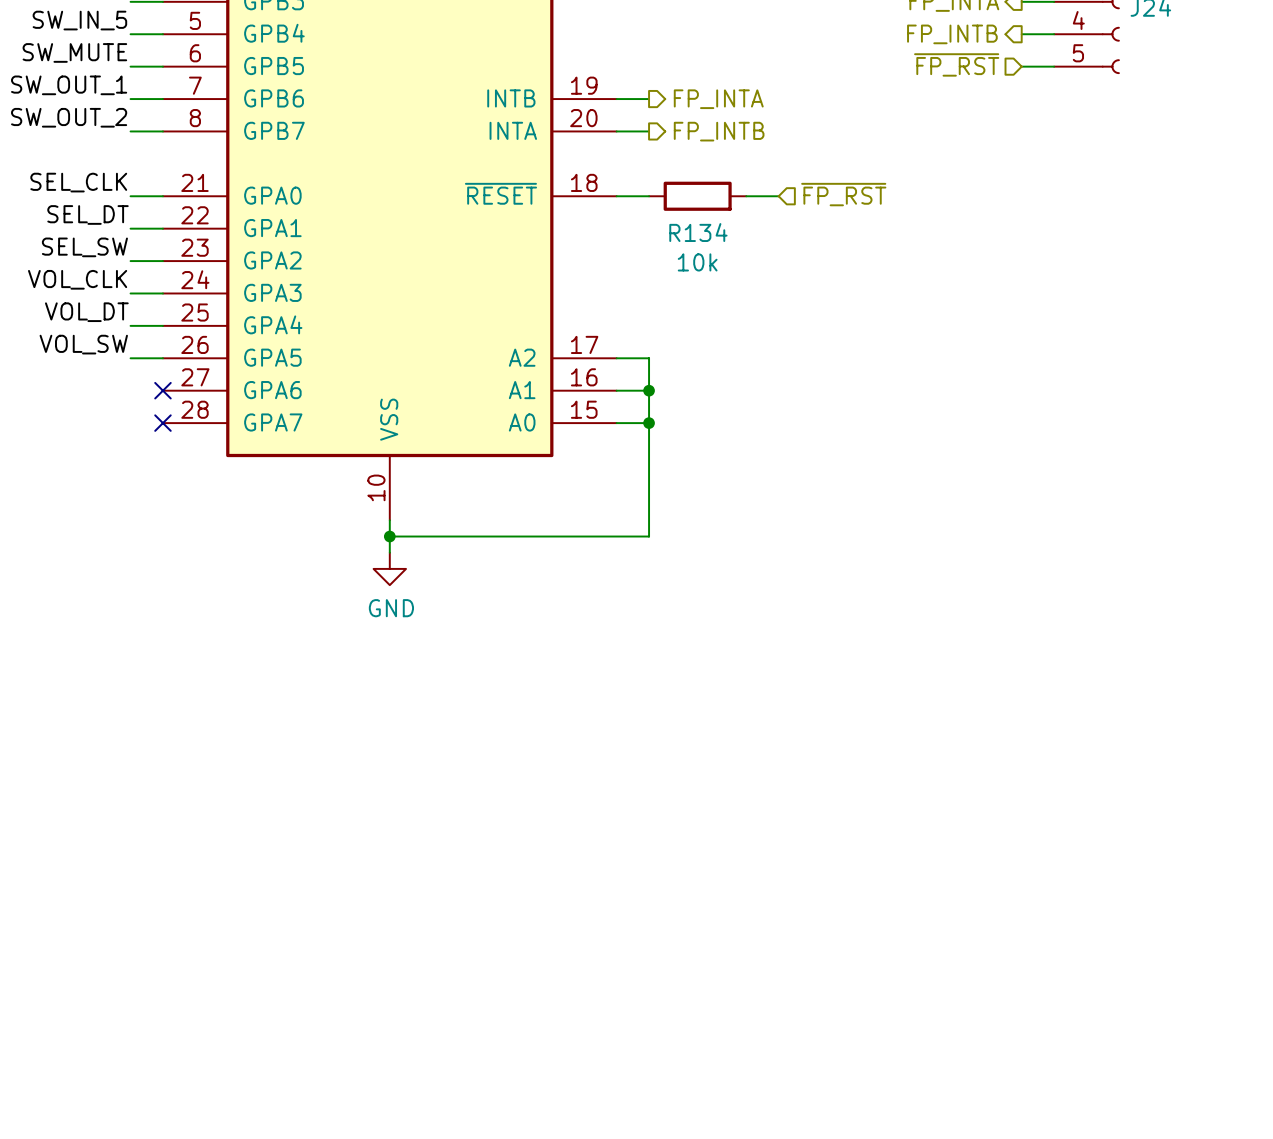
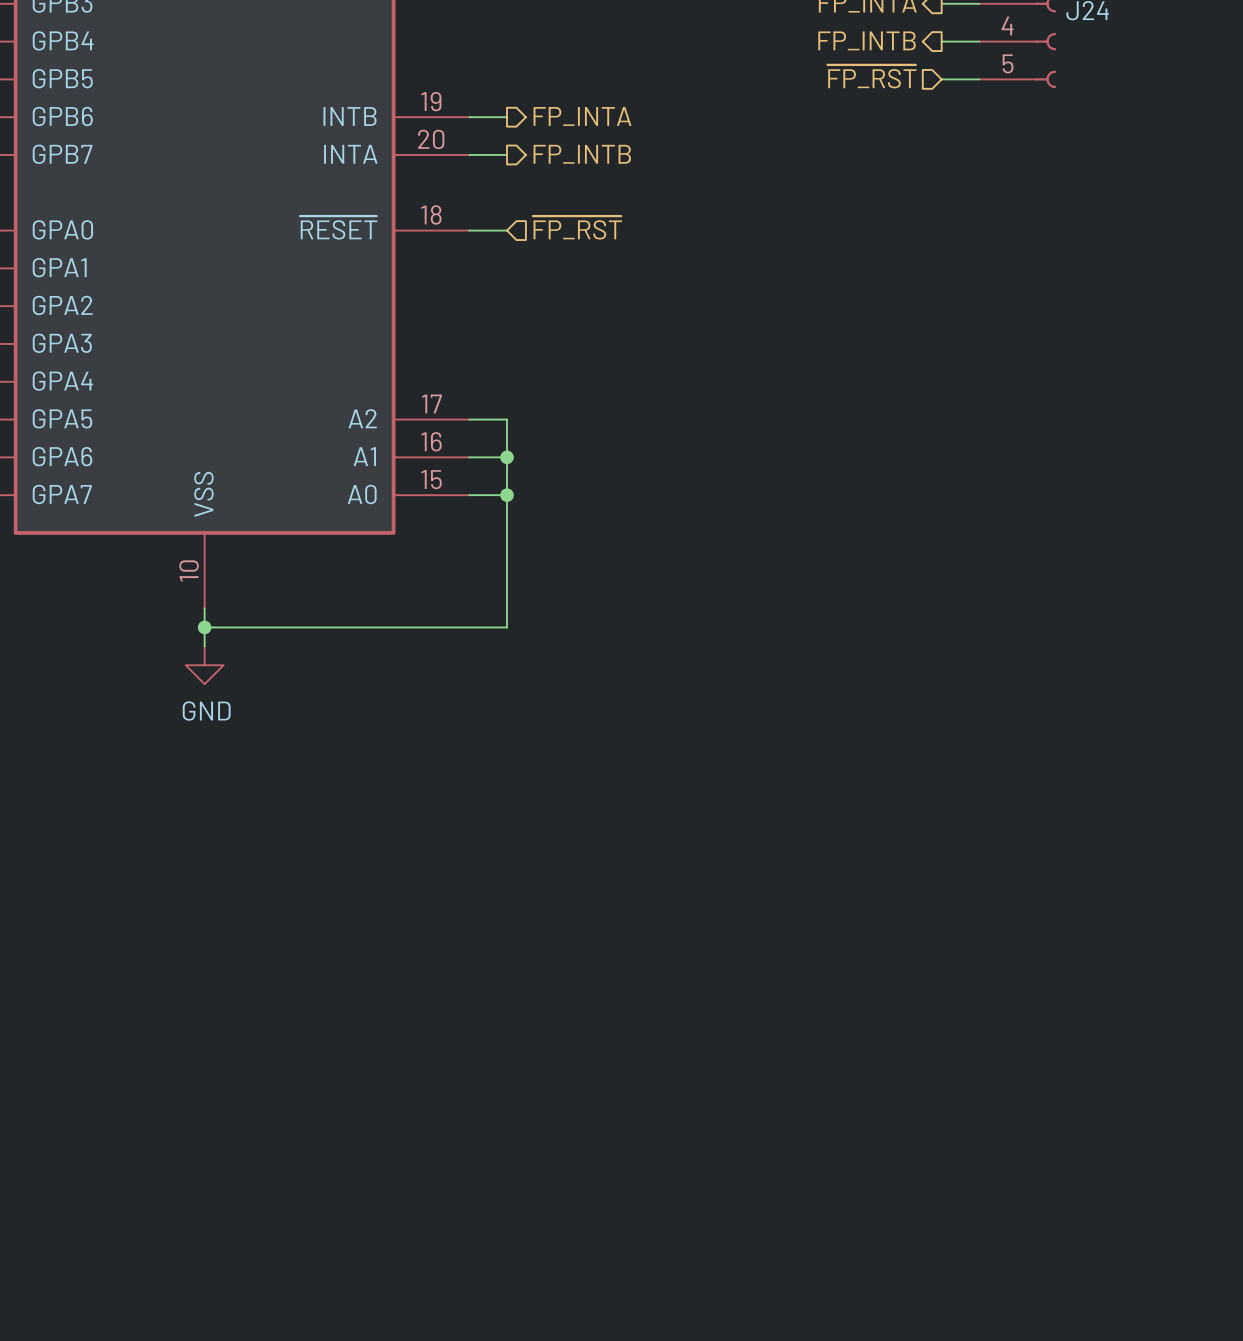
hierarchical label position: ~{FP_RST} (843, 194) -> ~{FP_RST} (577, 227)
R134: 10k (697, 196) -> none
wire: (746, 196) (778, 196) -> none

